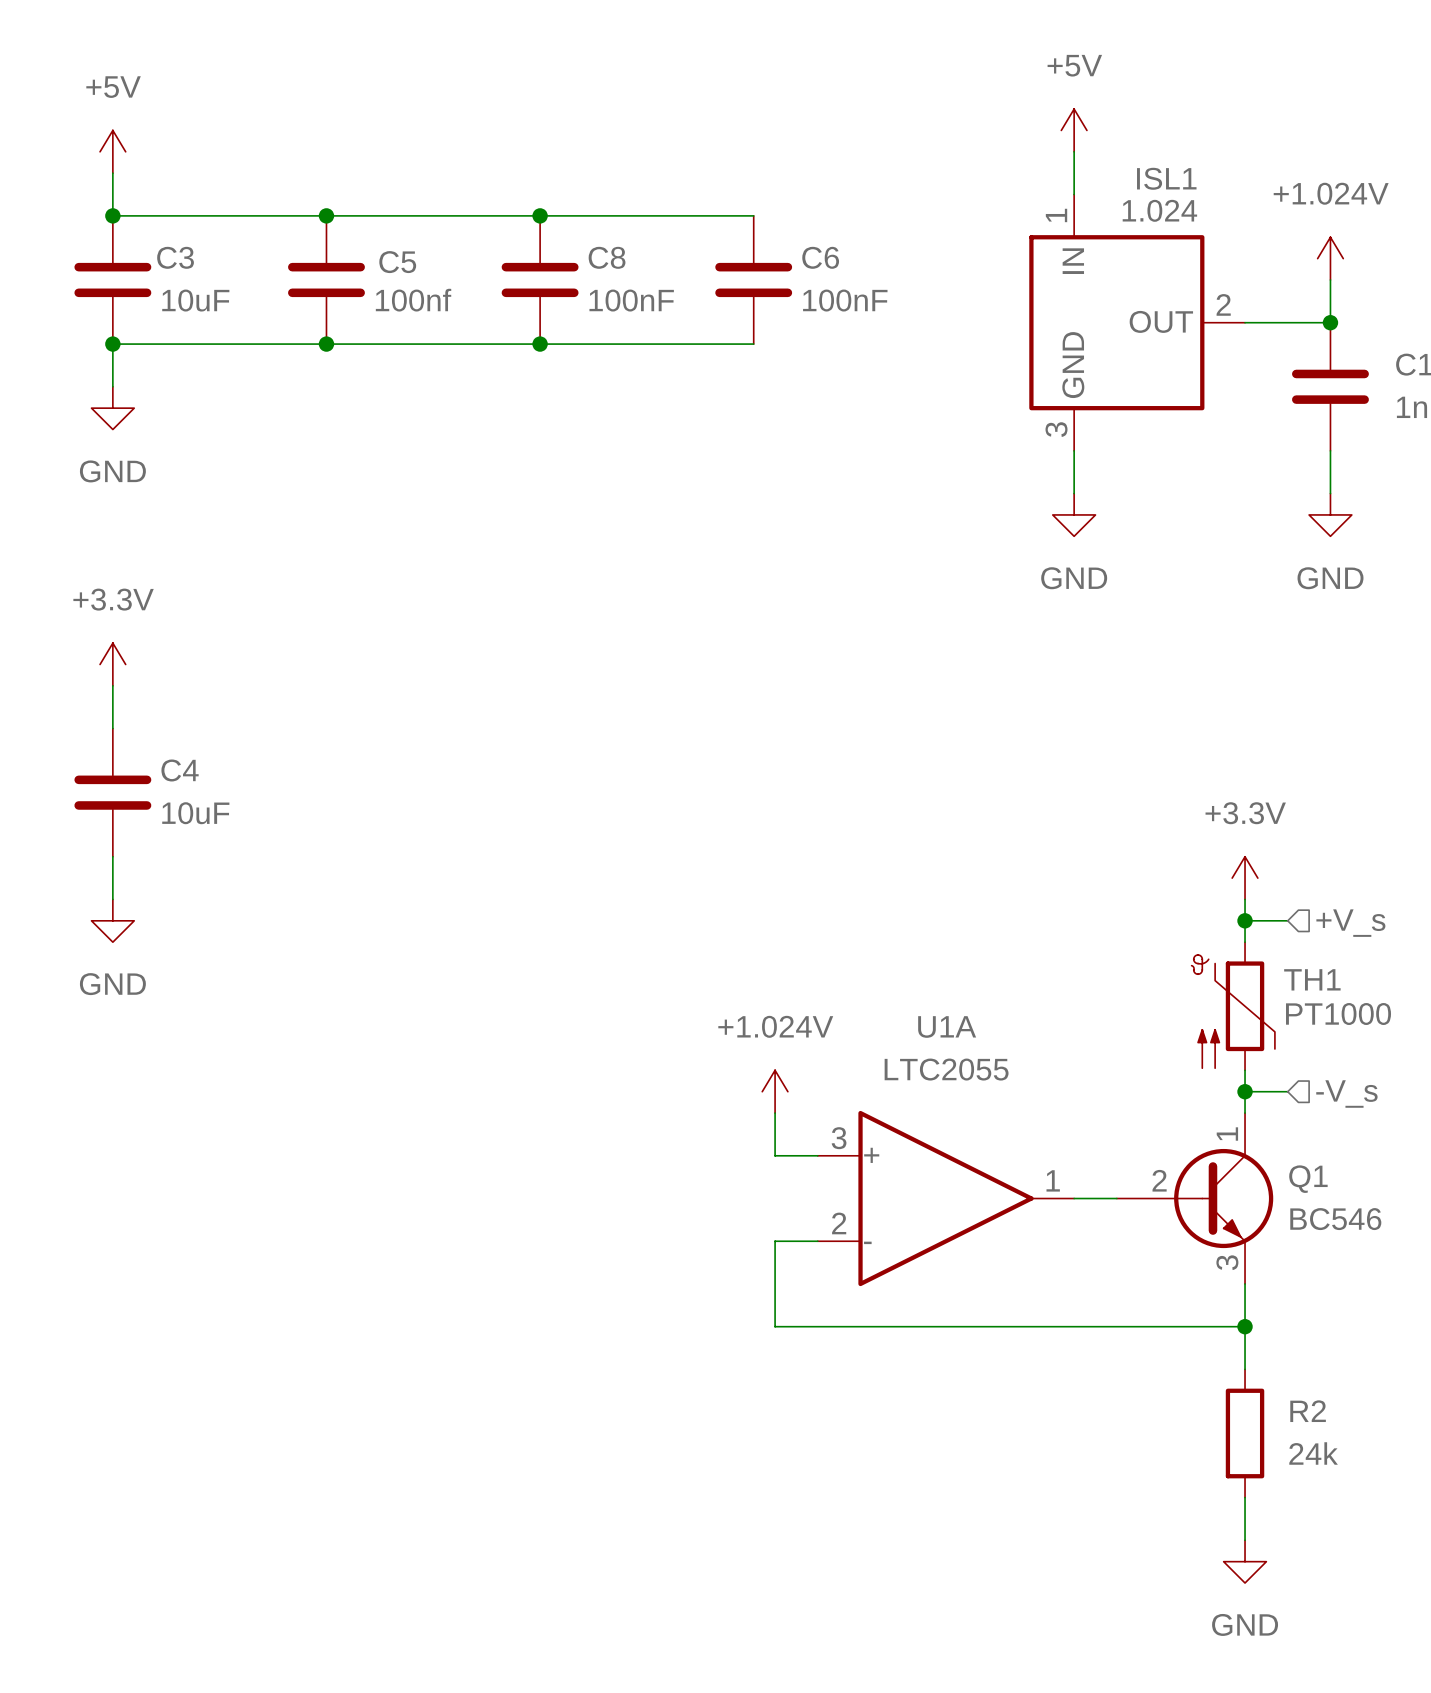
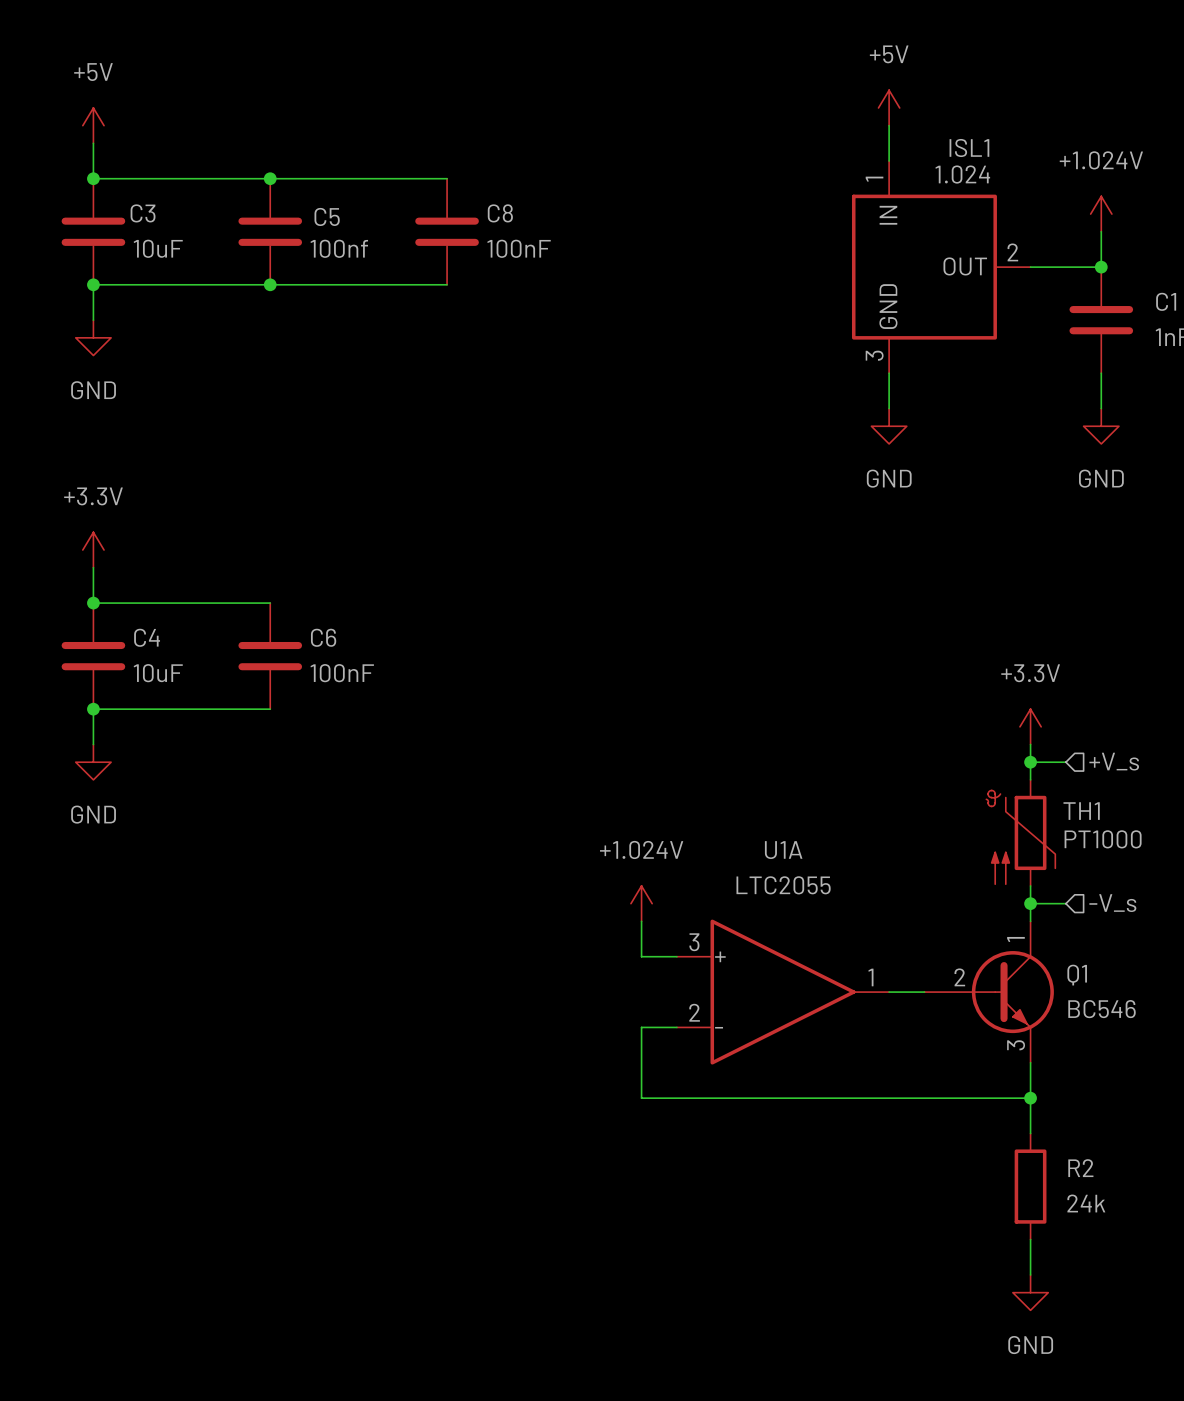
wire: (540, 215) (753, 215) -> none
junction: (540, 215) -> none
C6 position: (753, 279) -> (270, 656)
wire: (540, 344) (753, 344) -> none
junction: (540, 344) -> none
wire: none -> (93, 603) (270, 603)
junction: none -> (93, 603)
wire: none -> (93, 709) (270, 709)
junction: none -> (93, 709)

